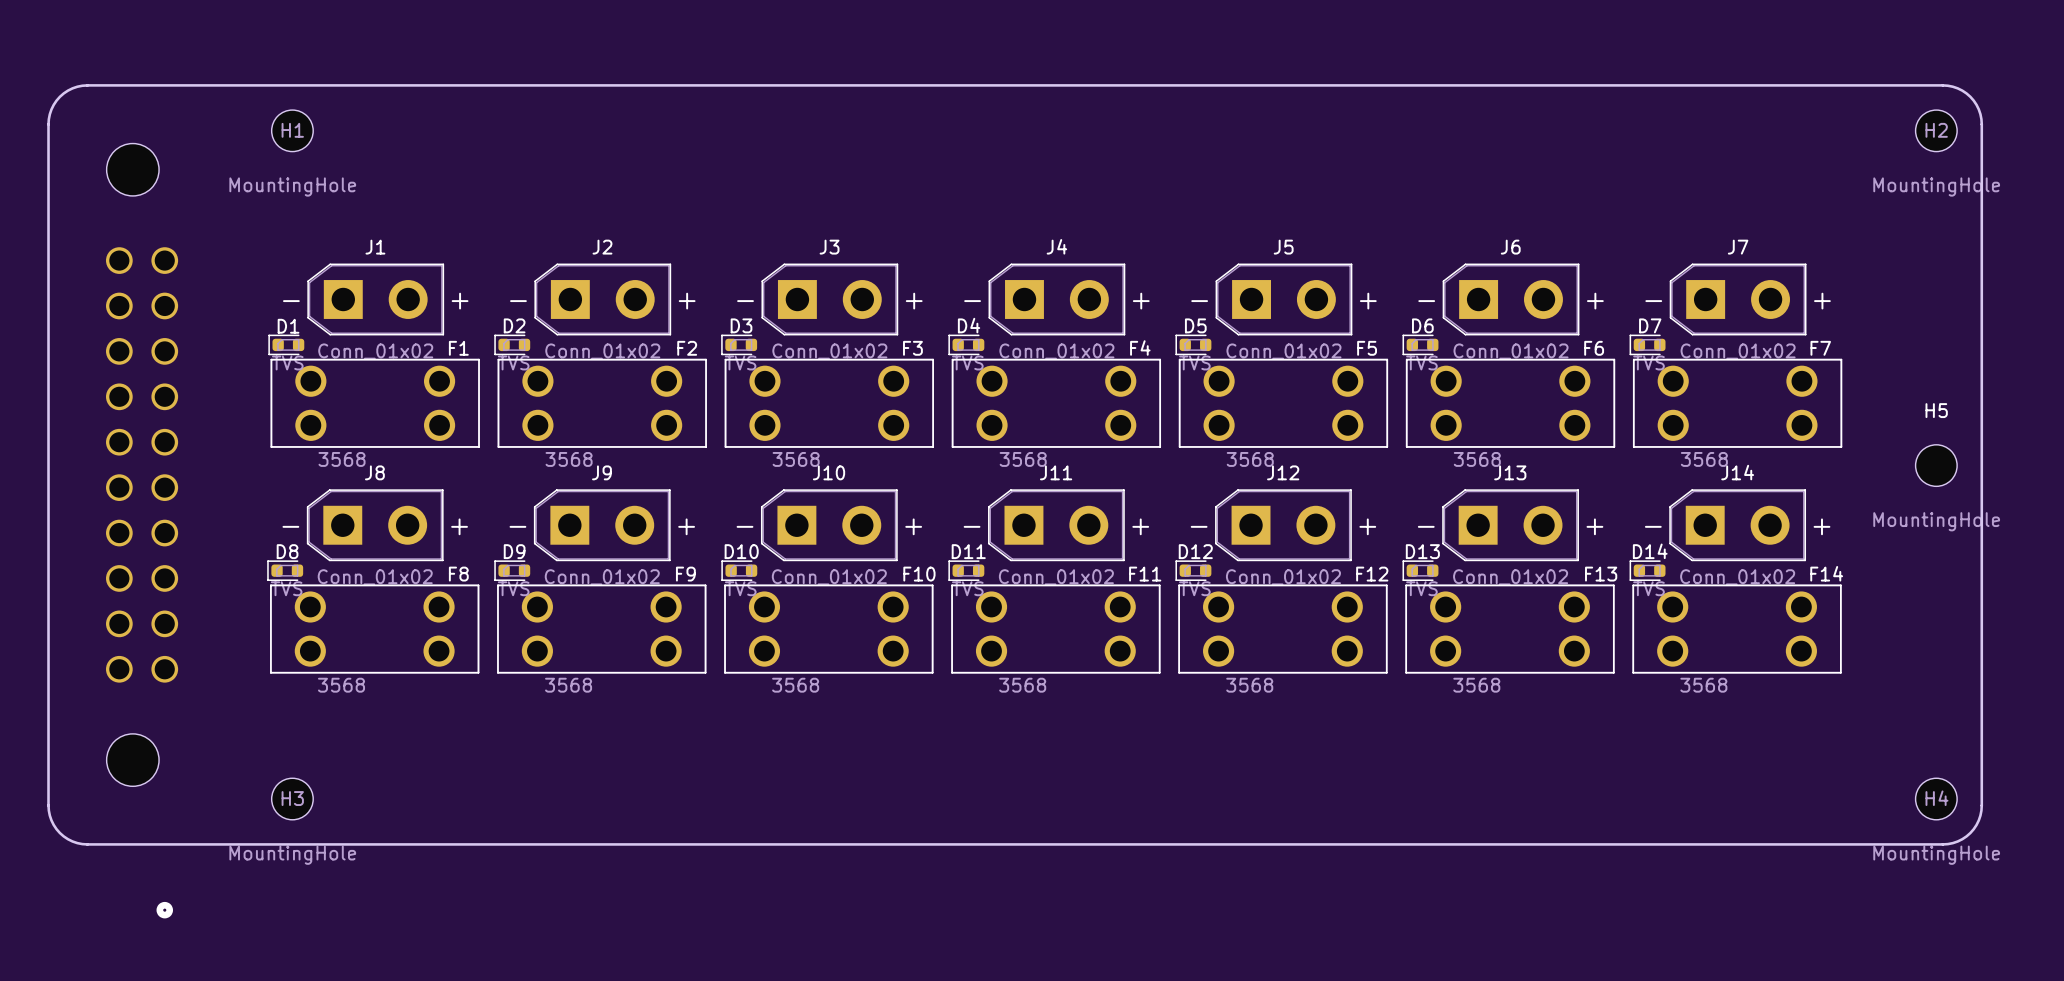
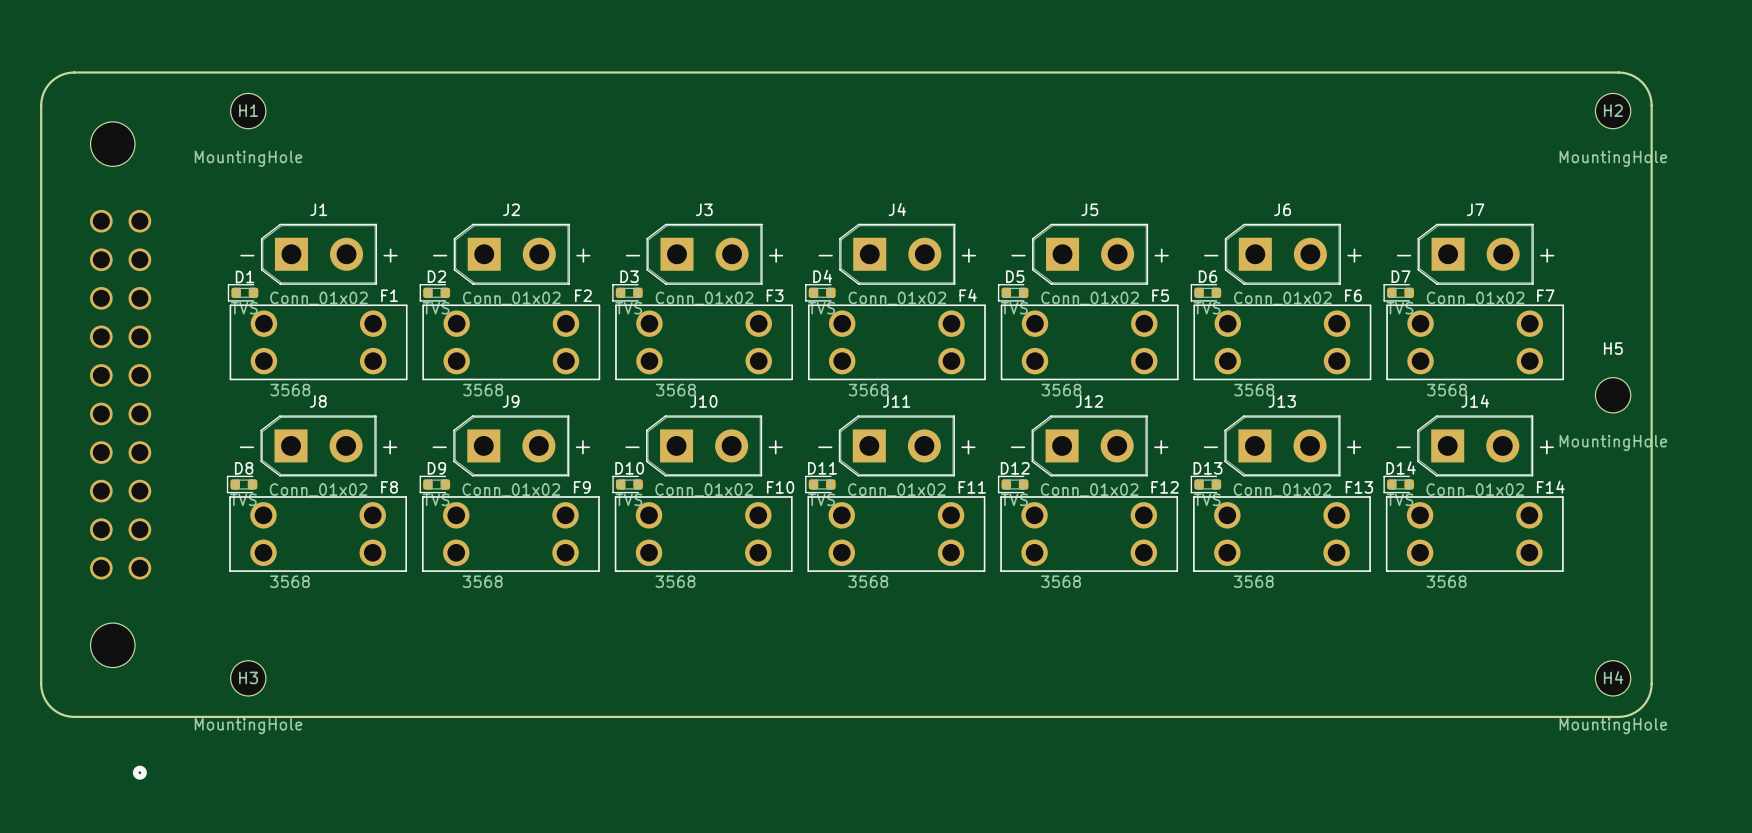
board edge: (1906, 85) (1947, 85) (1962, 90) (1976, 104) (1981, 124) (1981, 810) (1973, 829) (1957, 841) (1942, 844) (1906, 844) -> (1618, 72) (1631, 75) (1641, 82) (1649, 92) (1651, 105) (1651, 683) (1649, 696) (1641, 707) (1631, 714) (1618, 716)
H2 position: (1936, 130) -> (1613, 111)
H5 position: (1936, 465) -> (1613, 395)
H4 position: (1936, 799) -> (1613, 678)

